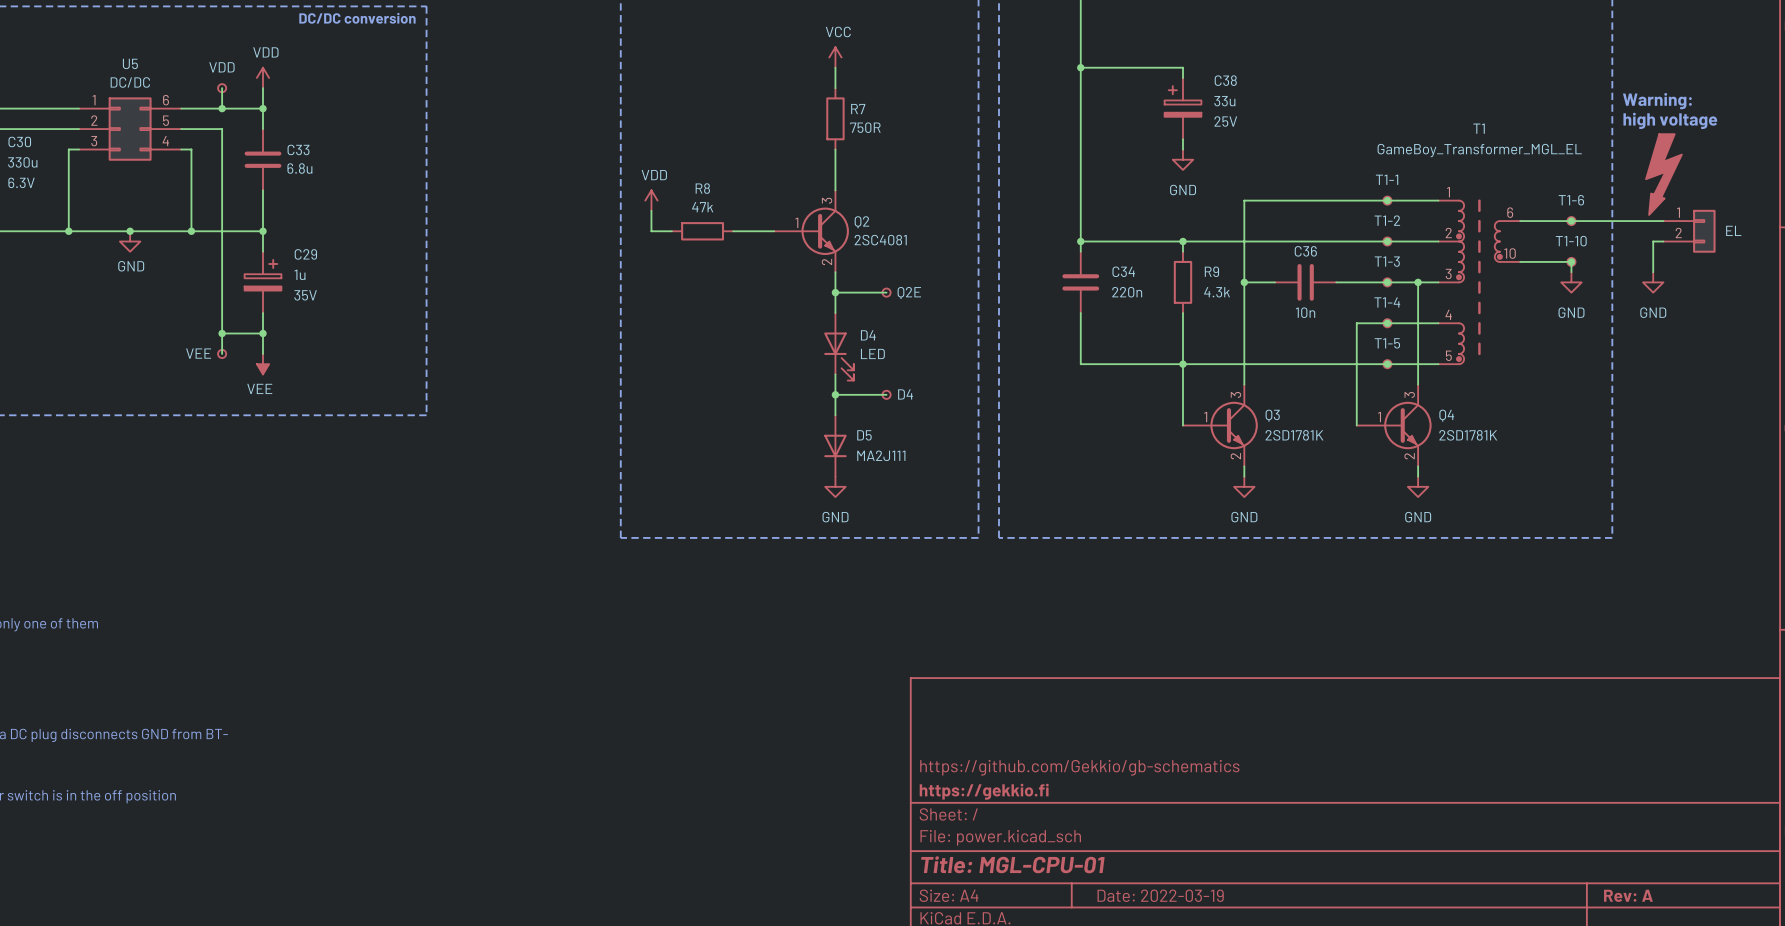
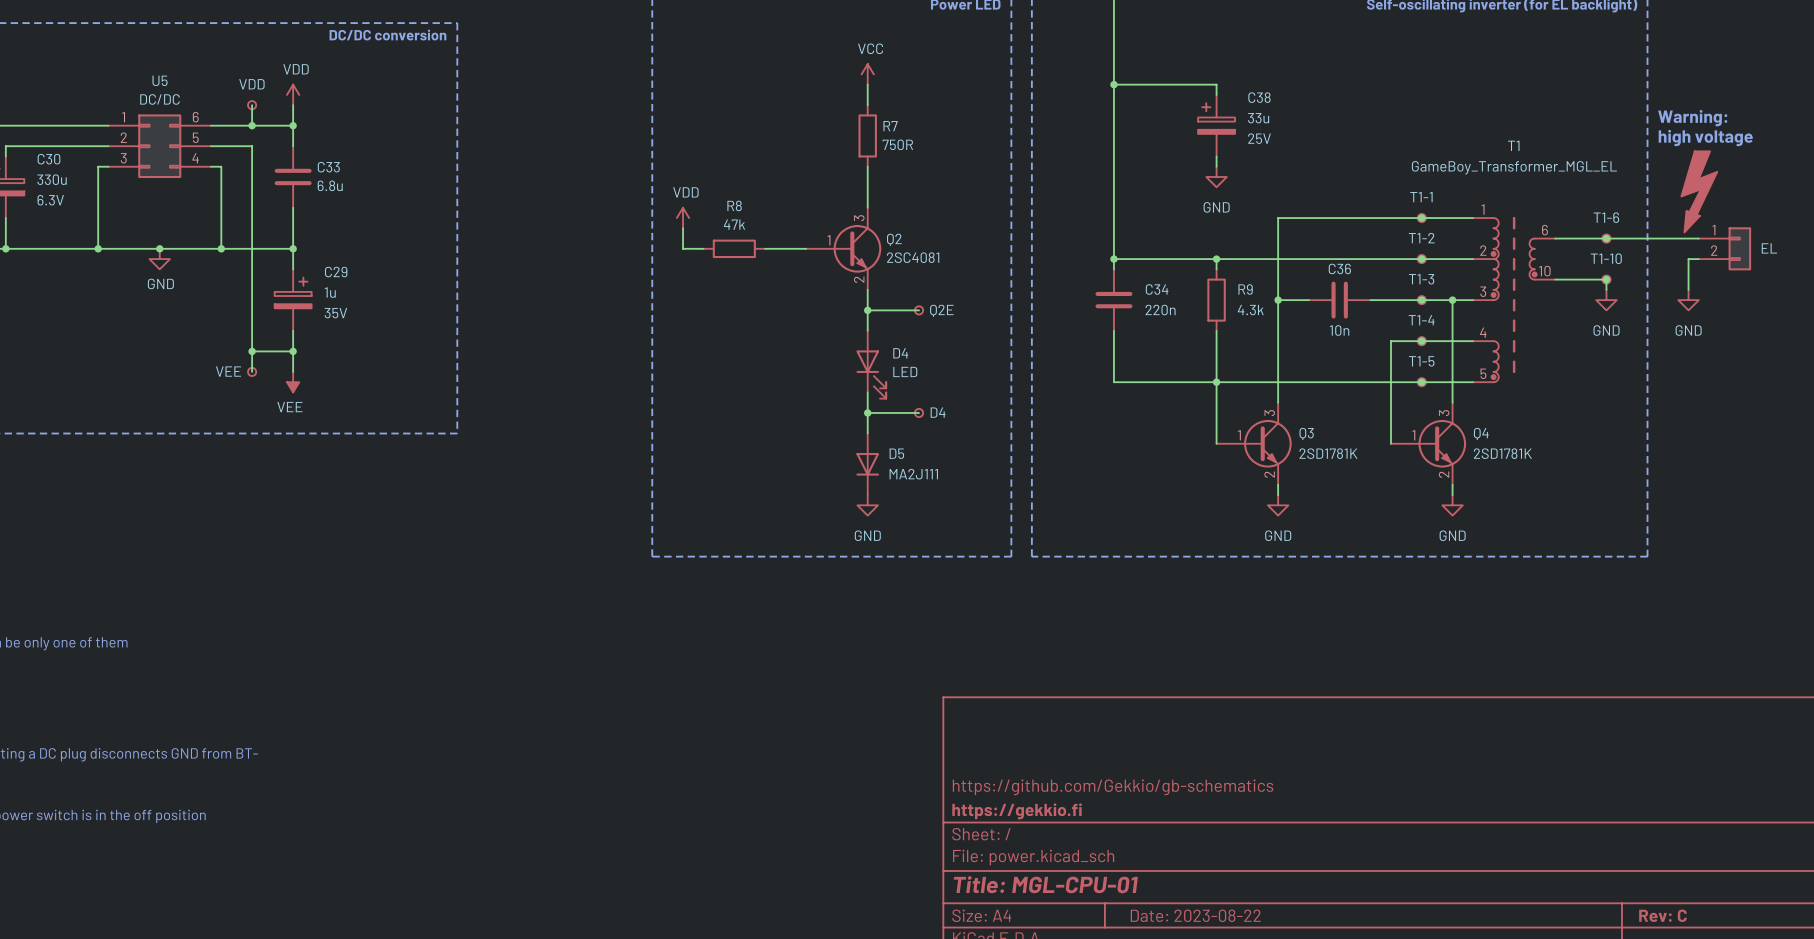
title block: Date: 2022-03-19 (1160, 895) -> Date: 2023-08-22 (1195, 915)
title block: Rev: A (1628, 895) -> Rev: C (1662, 915)

